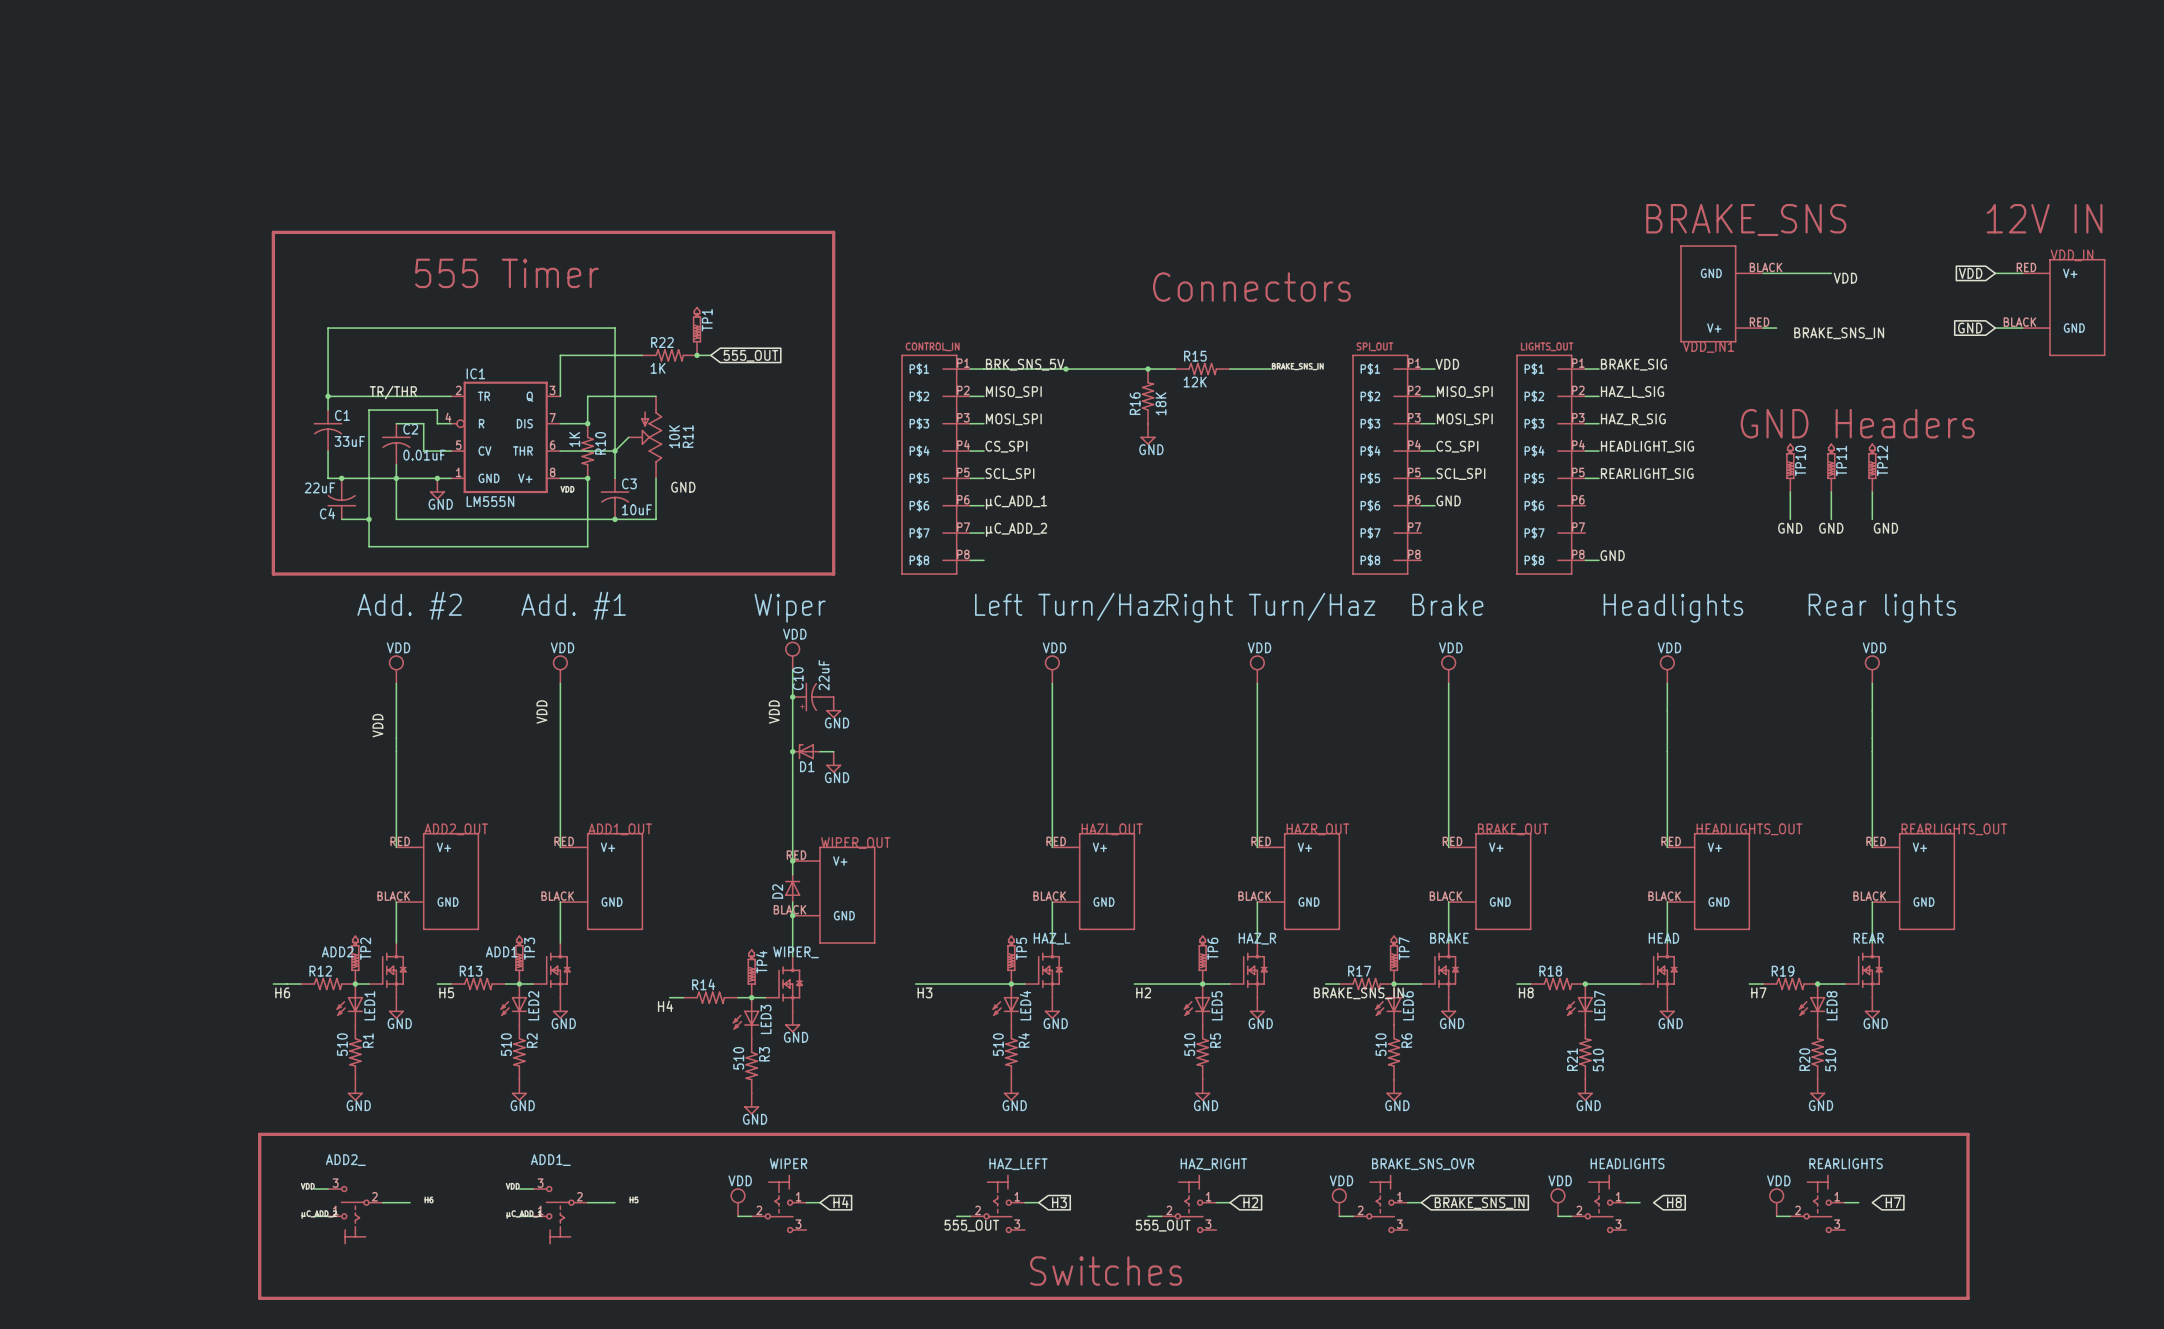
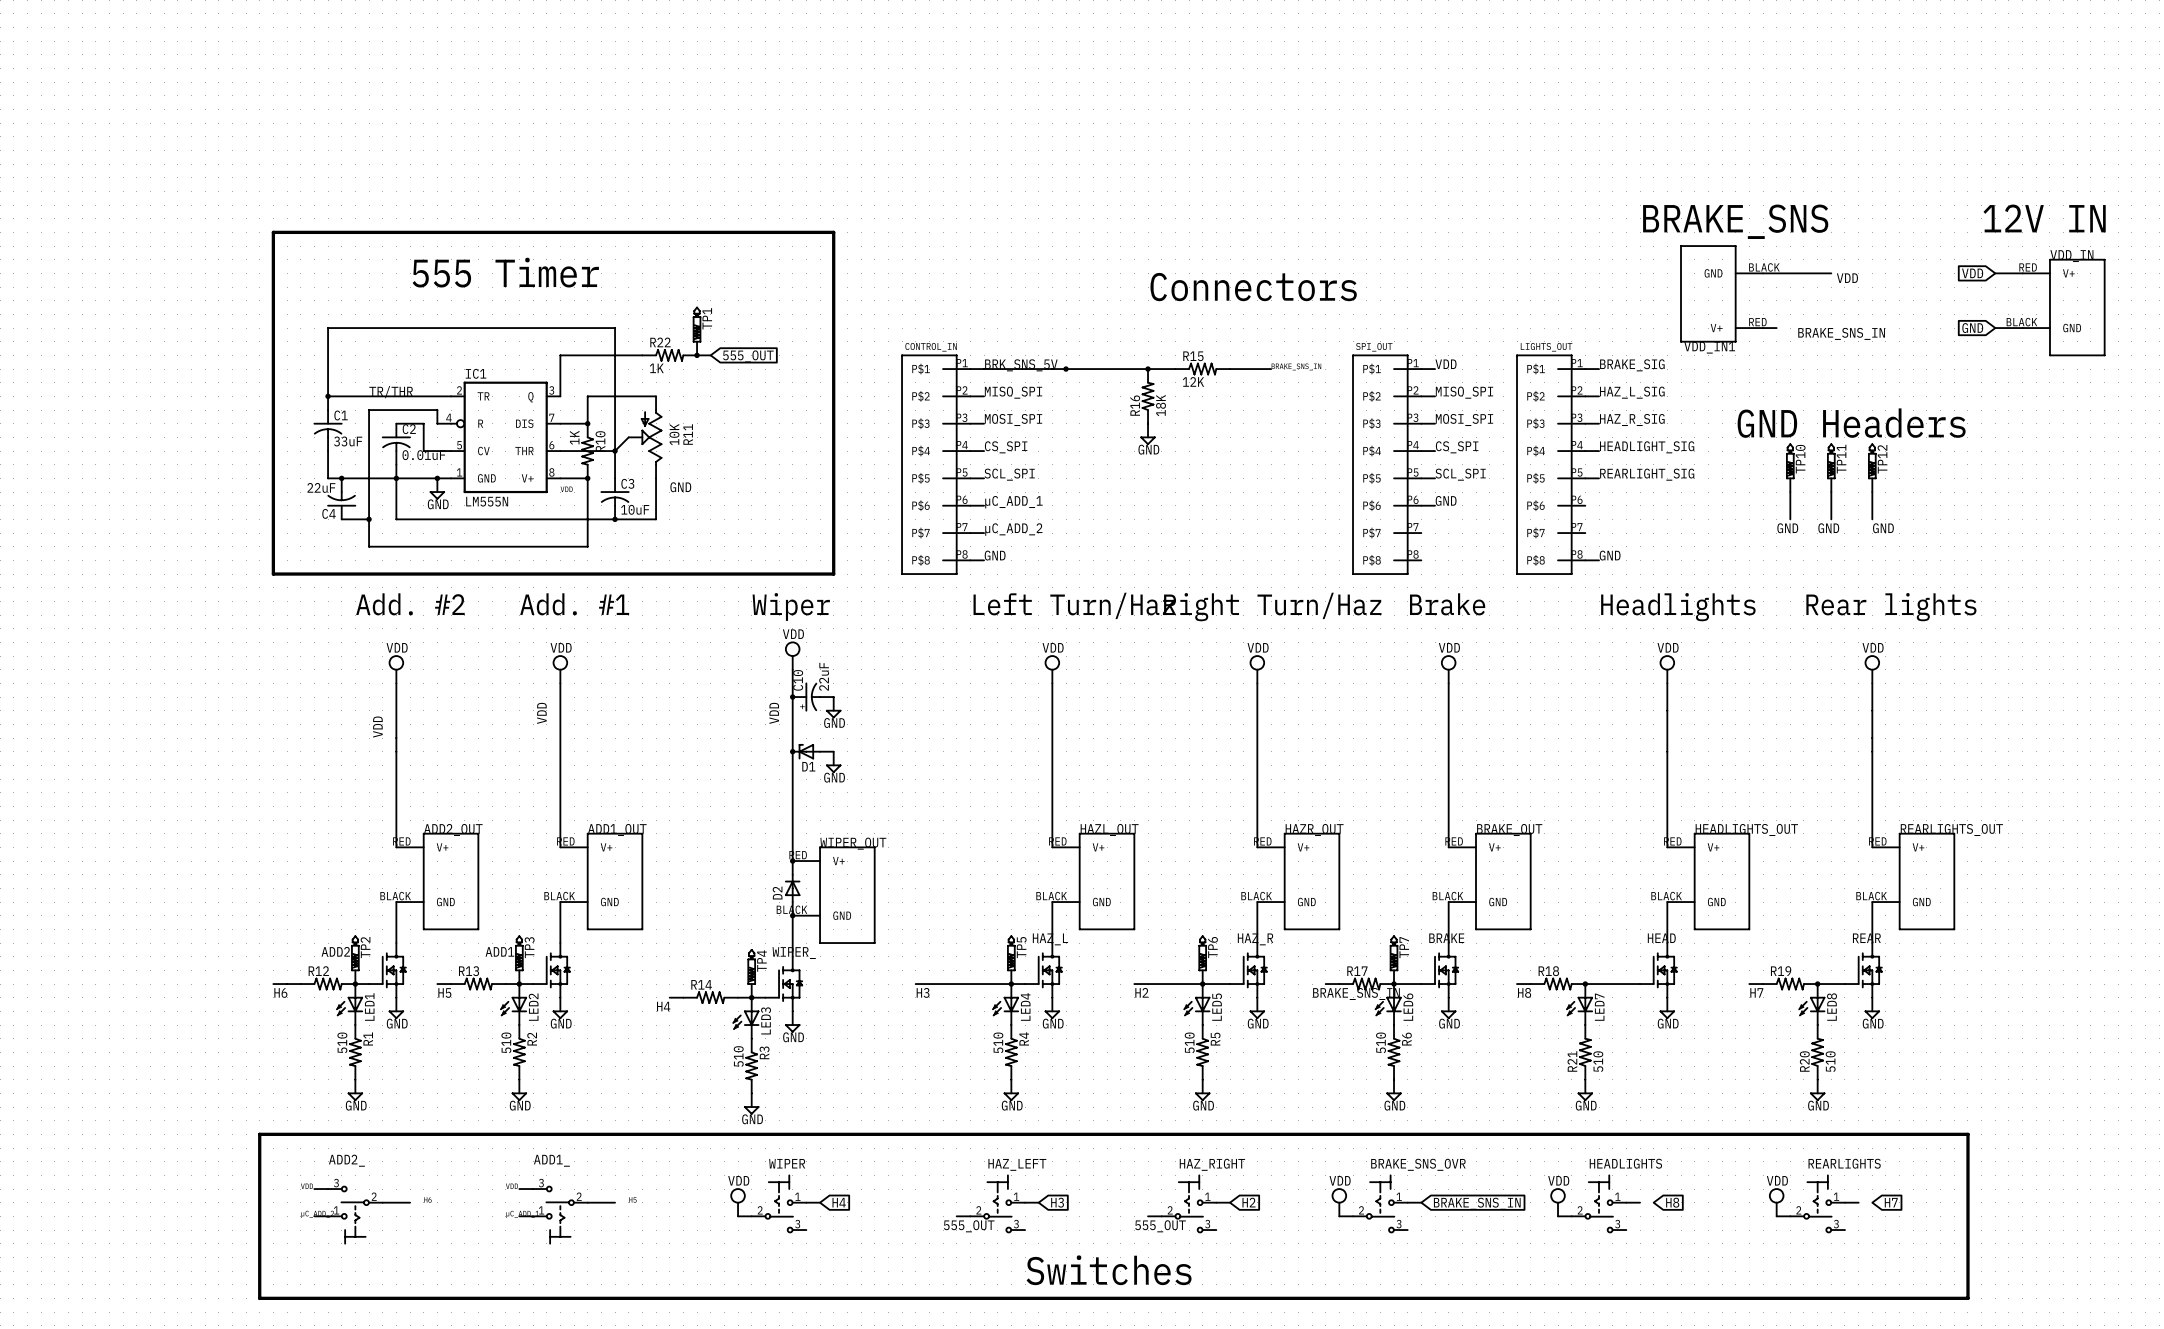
label: none -> GND (995, 555)

